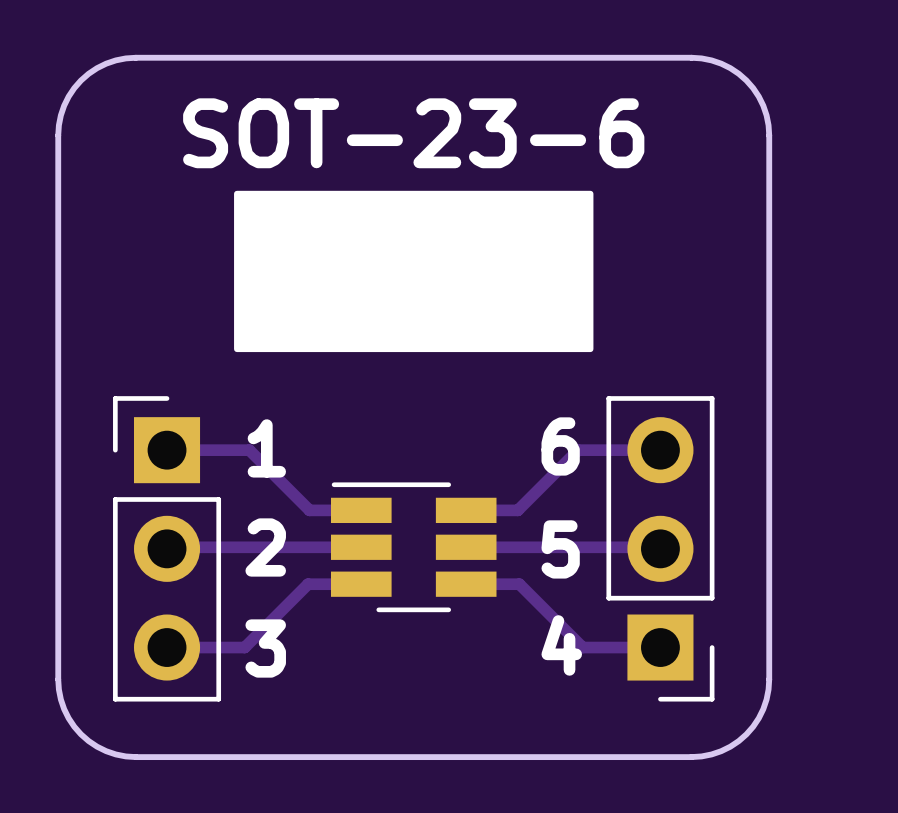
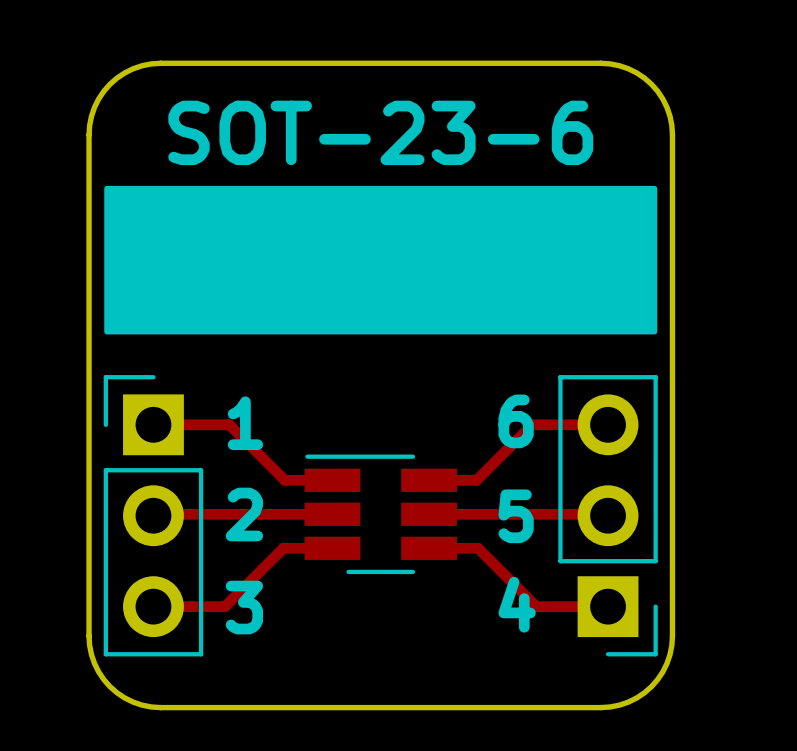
board edge: (174, 57) (125, 58) (97, 68) (80, 80) (68, 96) (60, 115) (58, 135) (58, 689) (64, 709) (74, 726) (97, 746) (125, 756) (174, 757) -> (160, 63) (133, 68) (110, 84) (94, 107) (89, 134) (89, 645) (94, 663) (110, 686) (133, 702) (160, 707)
board edge: (652, 57) (701, 58) (730, 68) (746, 80) (758, 96) (766, 115) (769, 135) (768, 689) (758, 718) (746, 734) (730, 746) (701, 756) (652, 757) -> (600, 63) (628, 68) (651, 84) (667, 107) (672, 134) (671, 645) (662, 671) (644, 692) (628, 702) (600, 707)
drawing shape: [234, 190, 594, 353] -> [104, 185, 658, 335]

